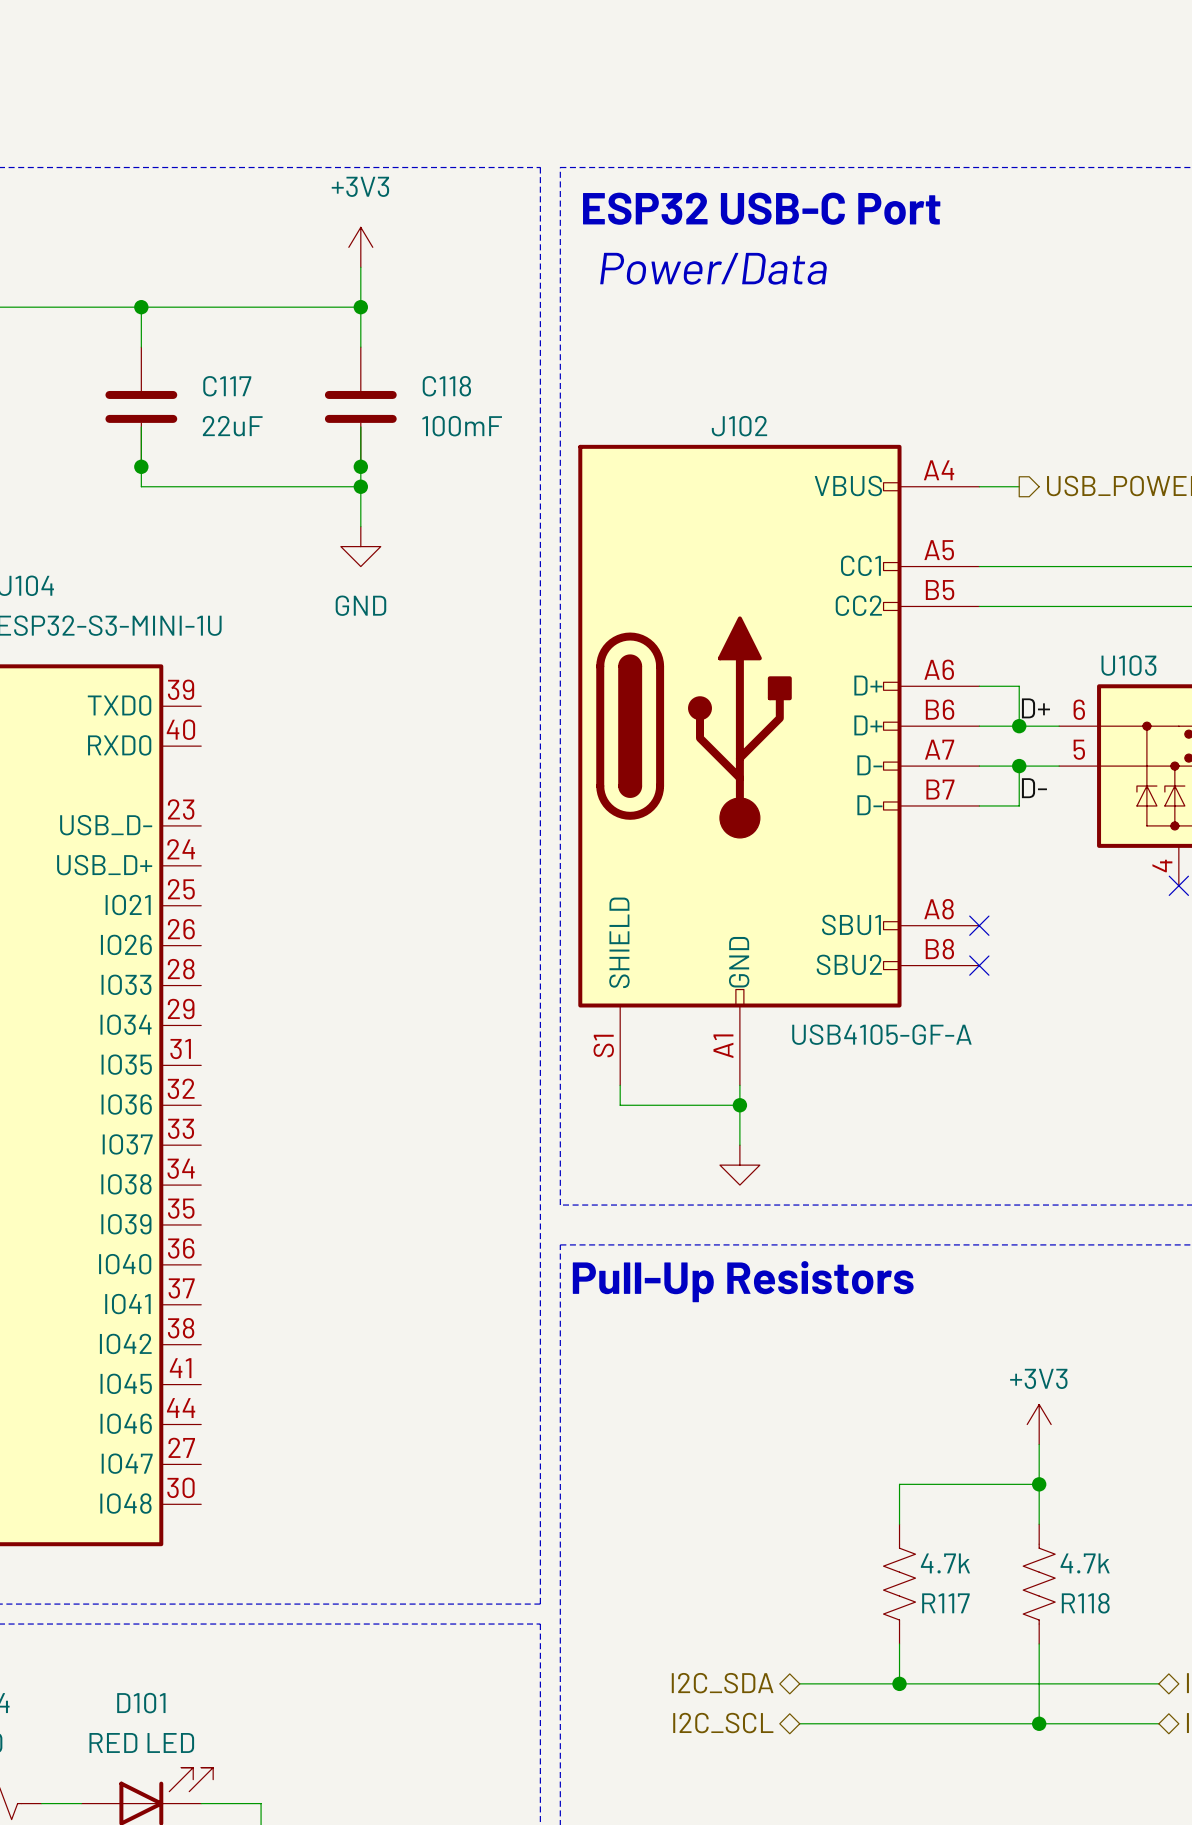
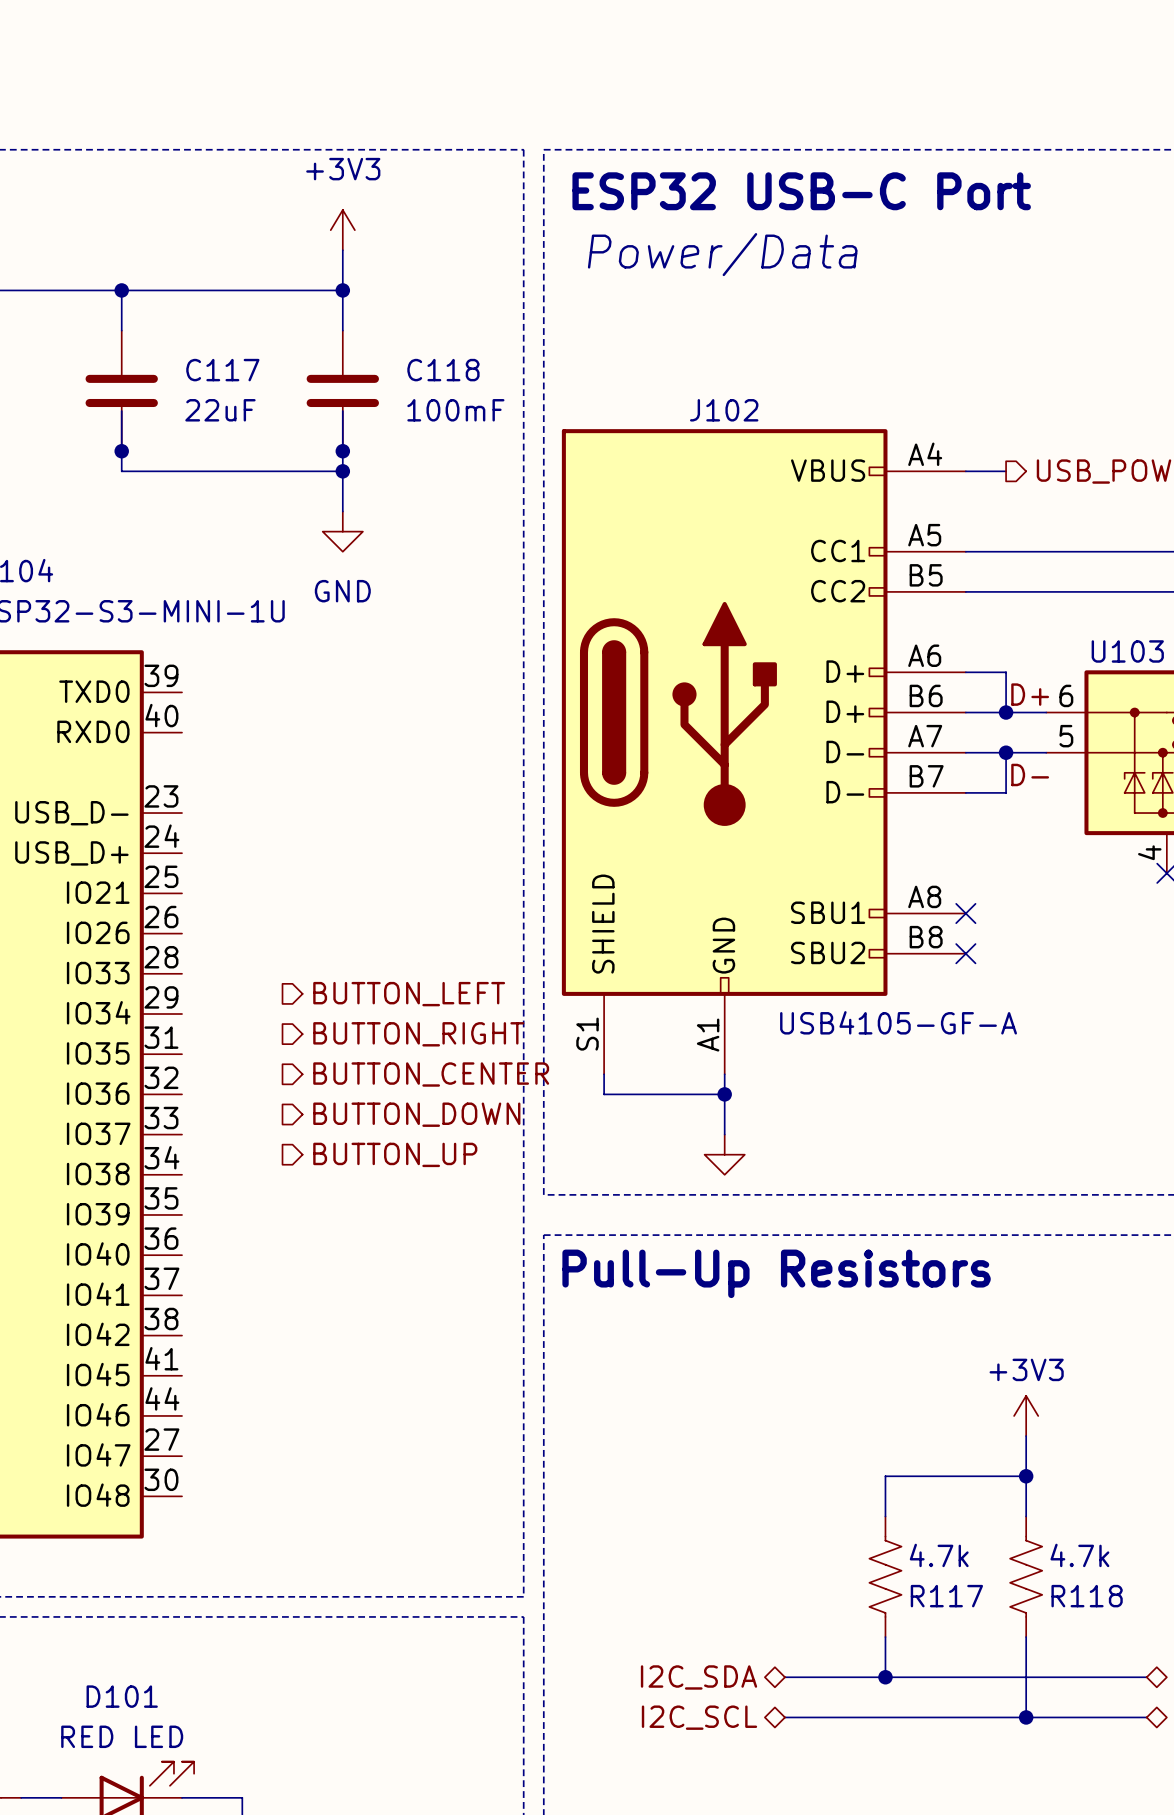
hierarchical label: none -> BUTTON_LEFT (409, 994)
hierarchical label: none -> BUTTON_RIGHT (418, 1034)
hierarchical label: none -> BUTTON_CENTER (431, 1074)
hierarchical label: none -> BUTTON_DOWN (416, 1114)
hierarchical label: none -> BUTTON_UP (395, 1154)

